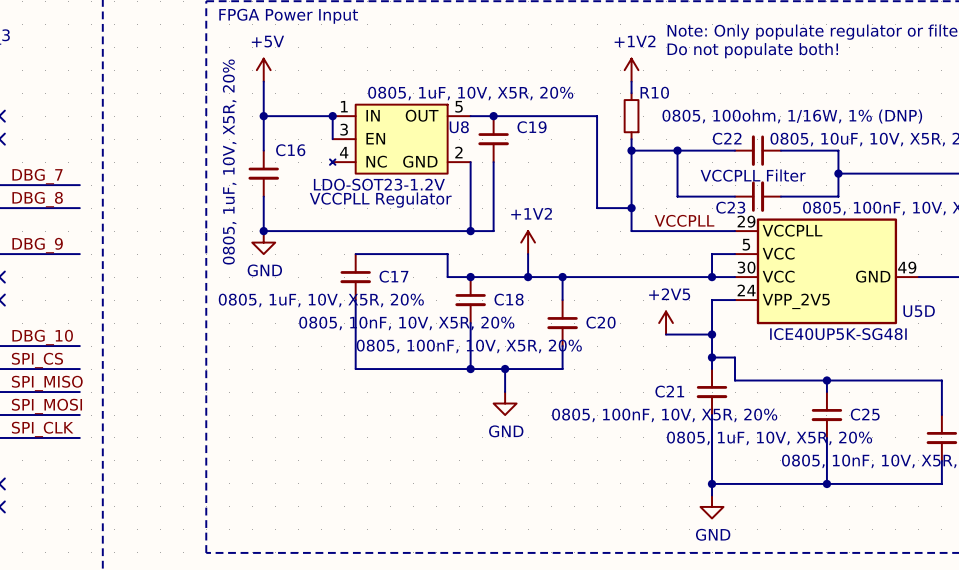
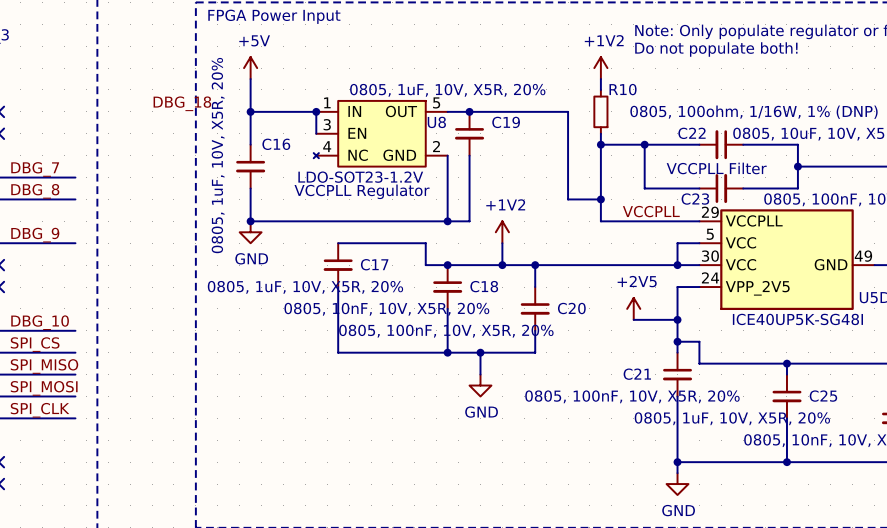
label: none -> DBG_18 (182, 103)

